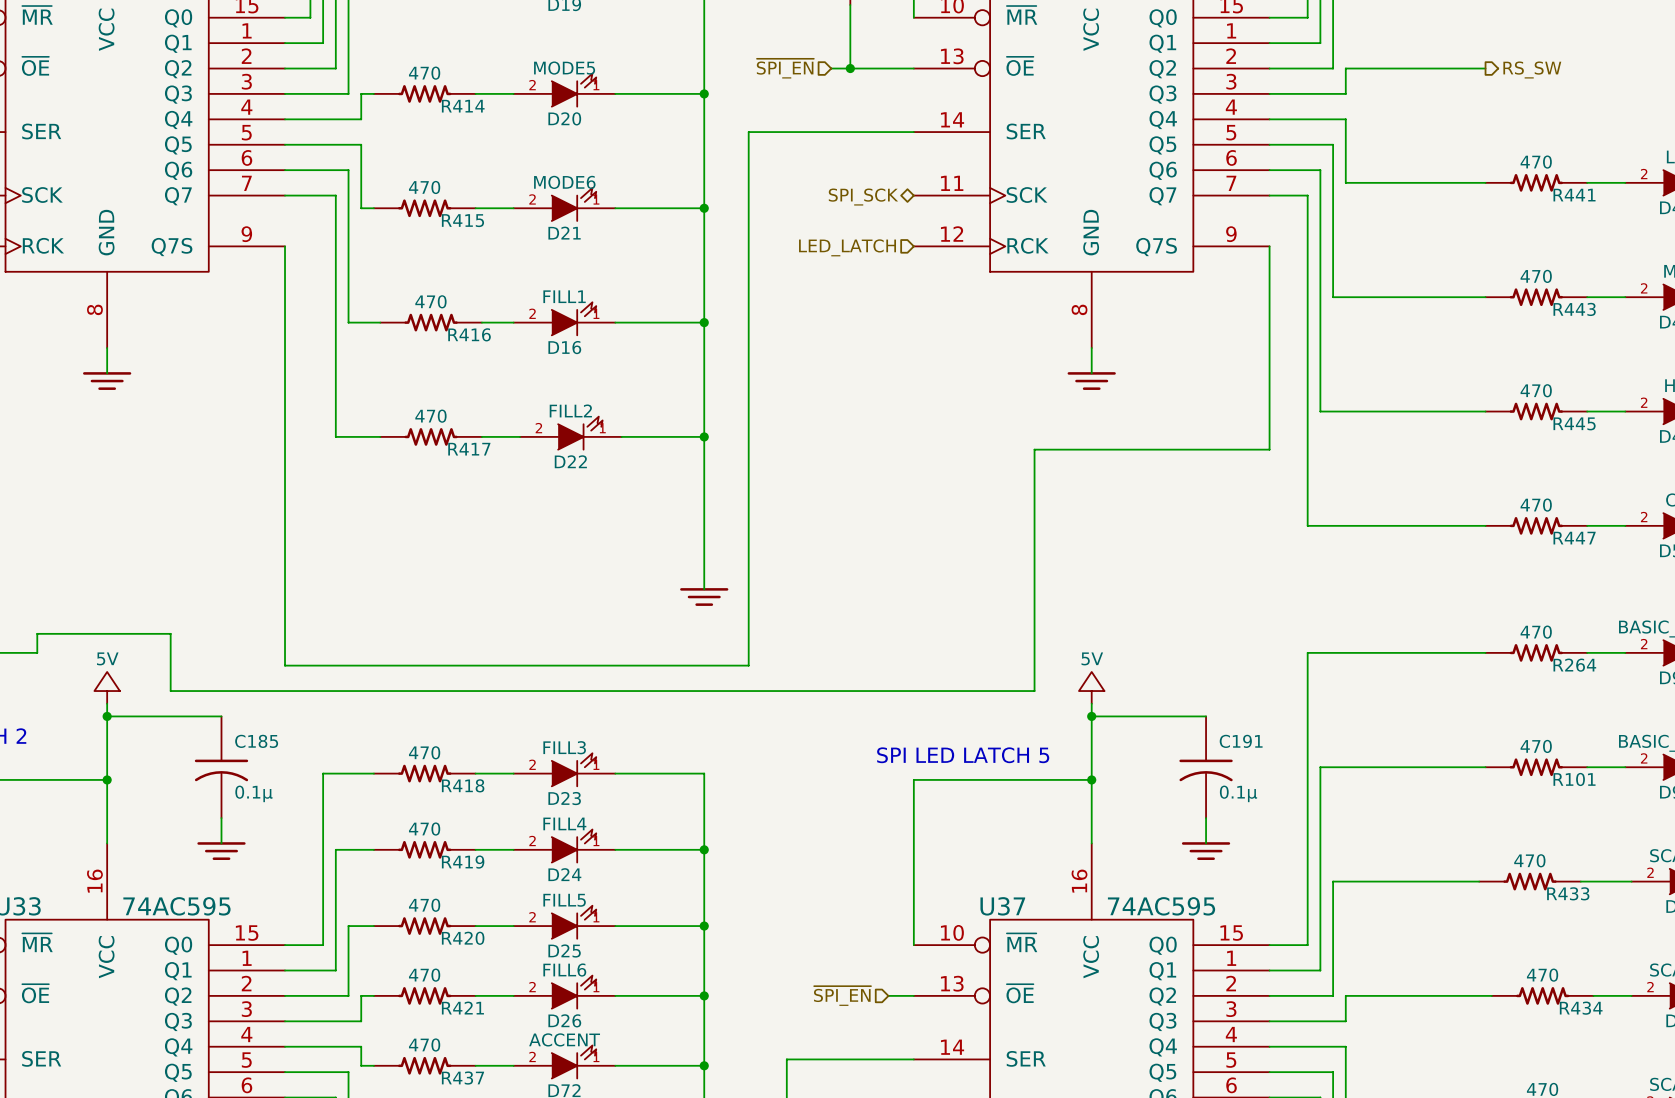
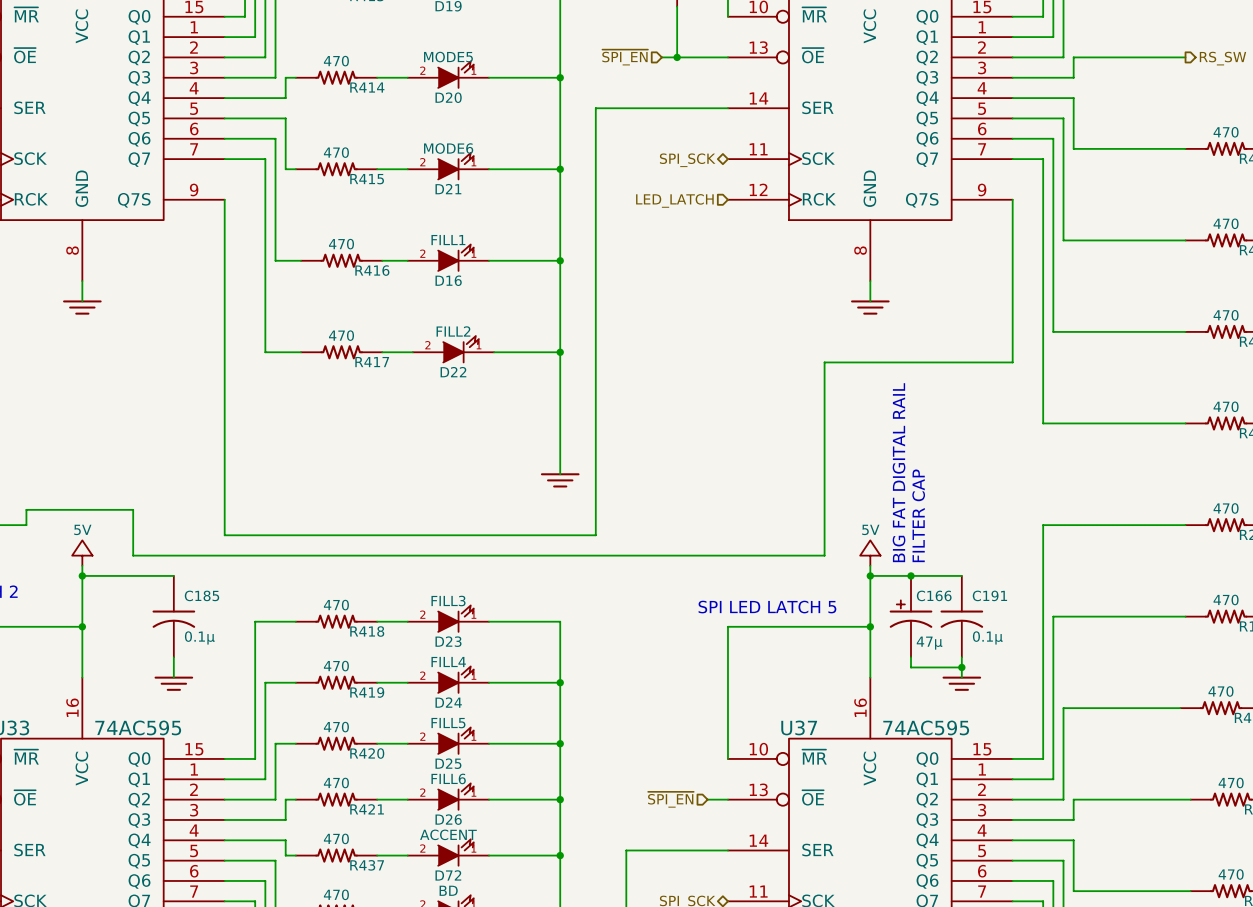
text: none -> BIG FAT DIGITAL RAIL (899, 472)
text: none -> FILTER CAP (918, 515)
junction: none -> (911, 575)
C166: none -> 47μ (911, 616)
wire: none -> (911, 657) (911, 667) (961, 667)
junction: none -> (961, 667)

